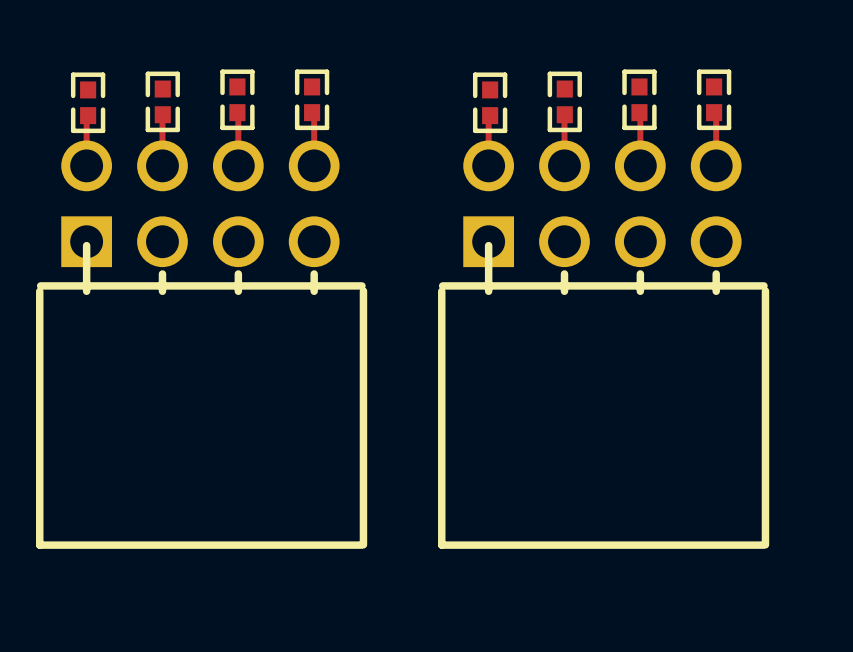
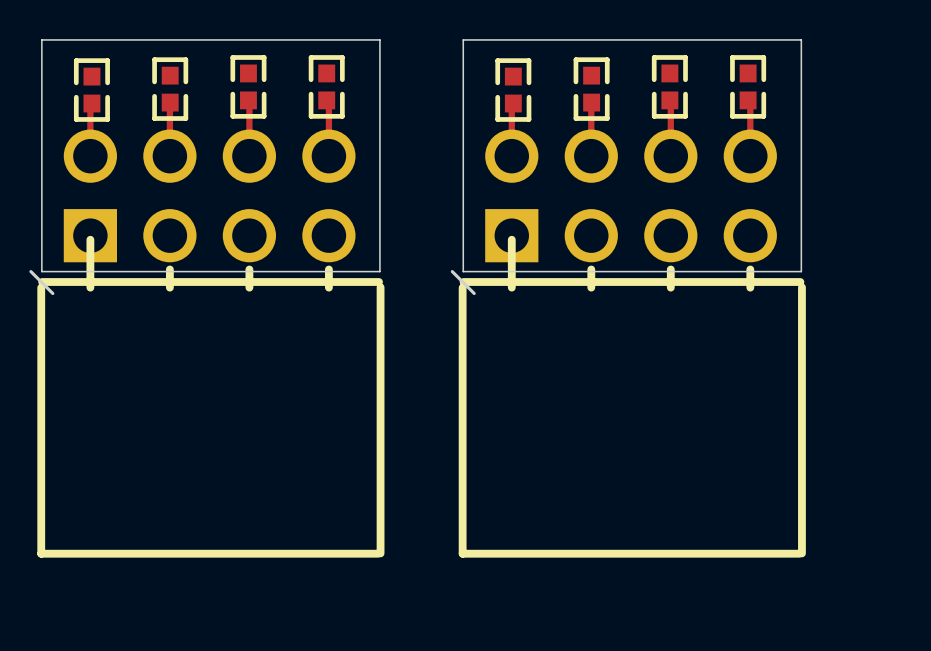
board edge: none -> (41, 39) (379, 39) (379, 271) (41, 271) (41, 39)
board edge: none -> (463, 39) (801, 39) (801, 271) (463, 271) (463, 39)
board edge: none -> (30, 271) (52, 293)
board edge: none -> (452, 271) (474, 293)

